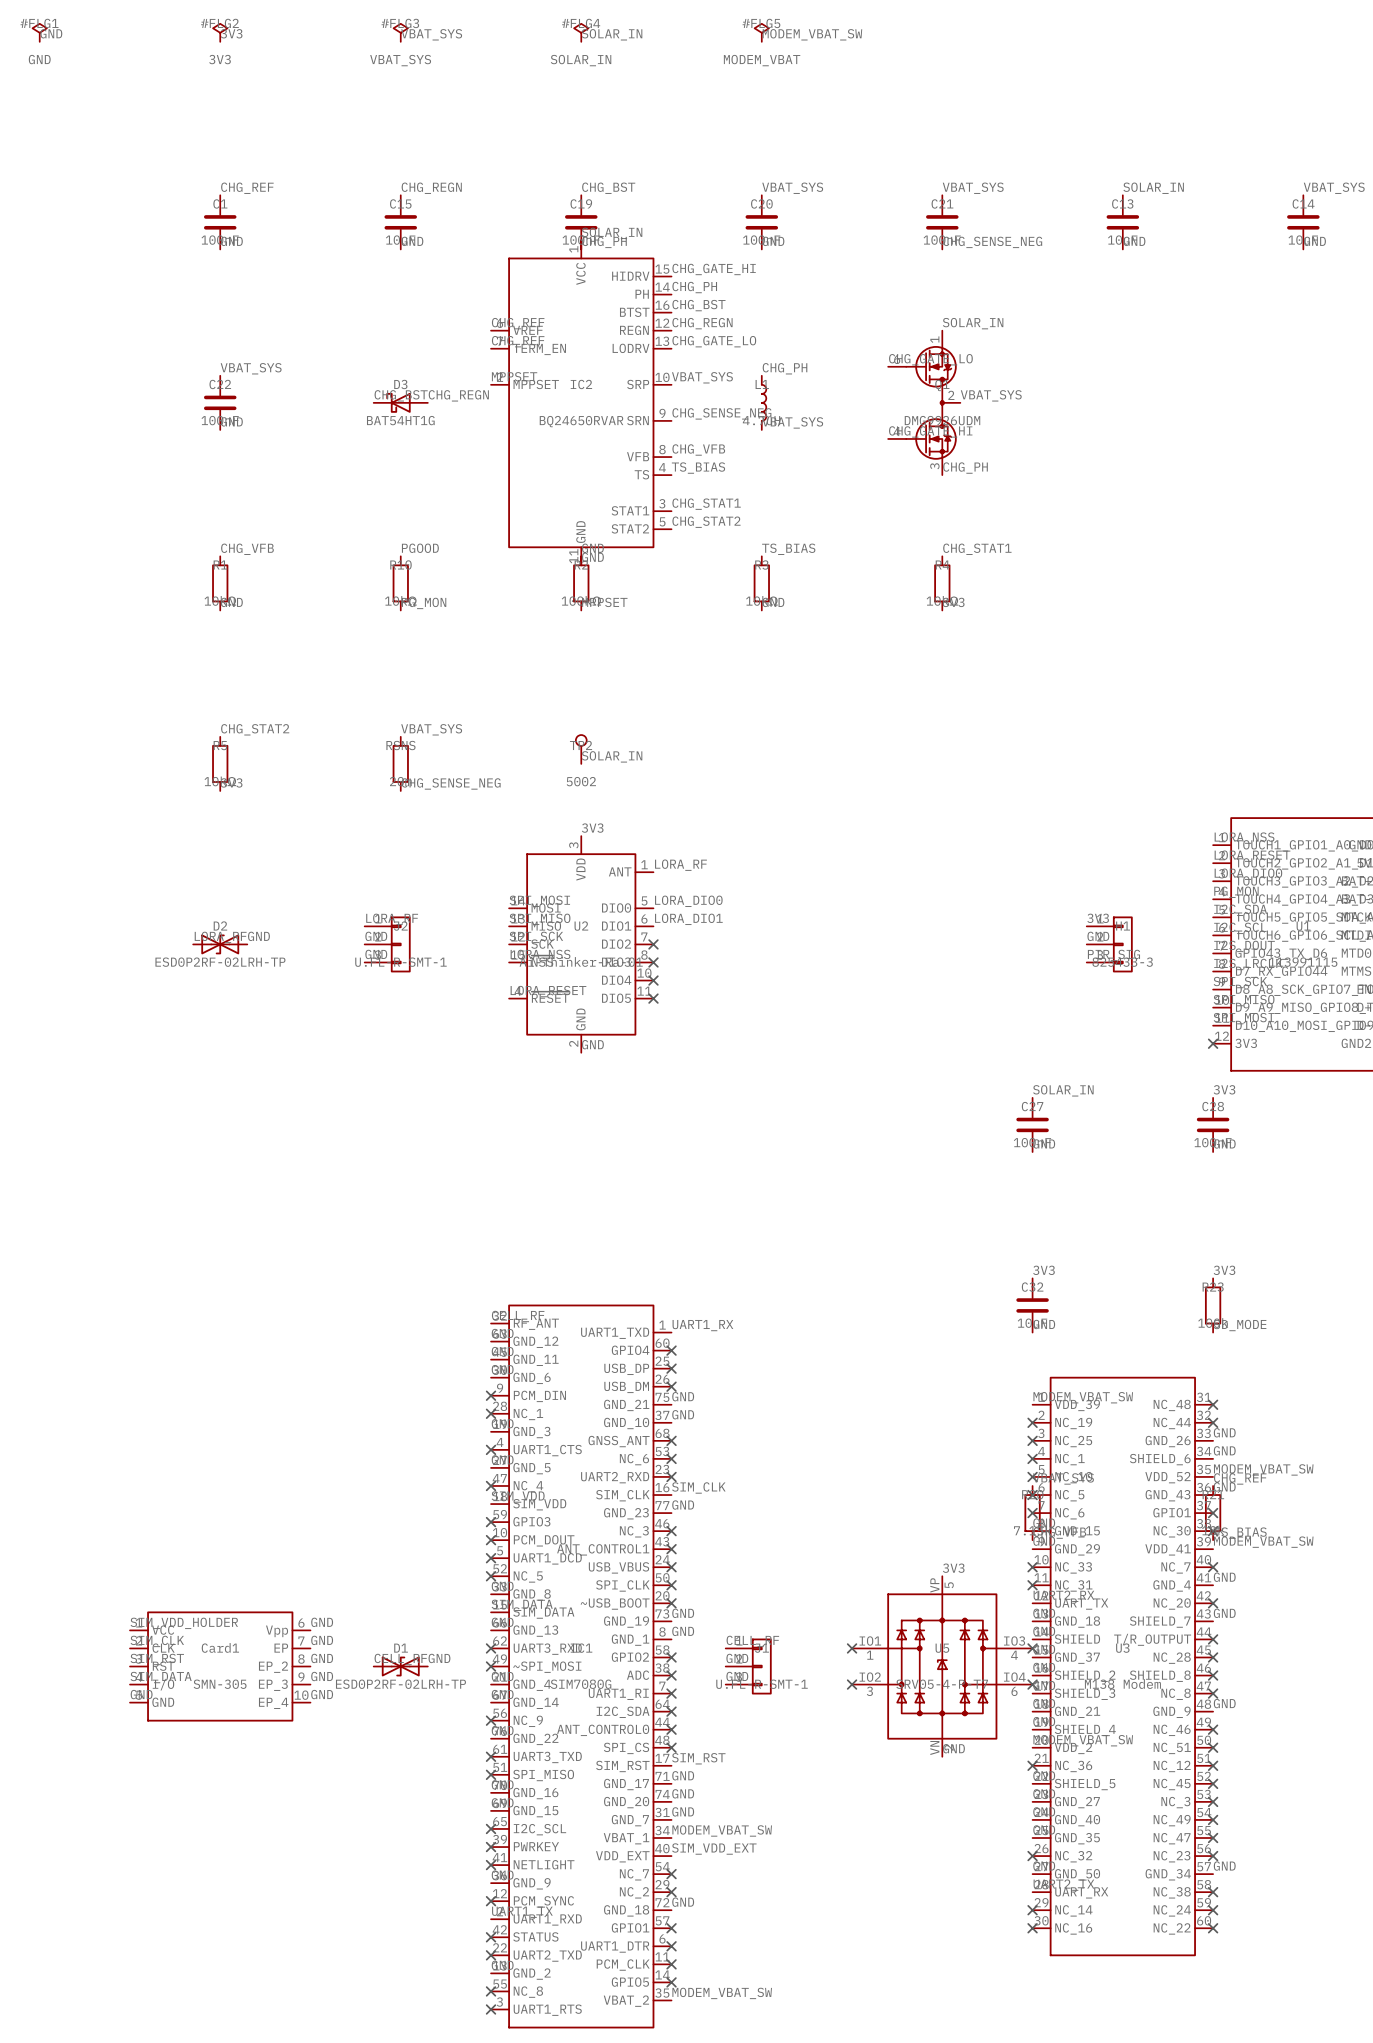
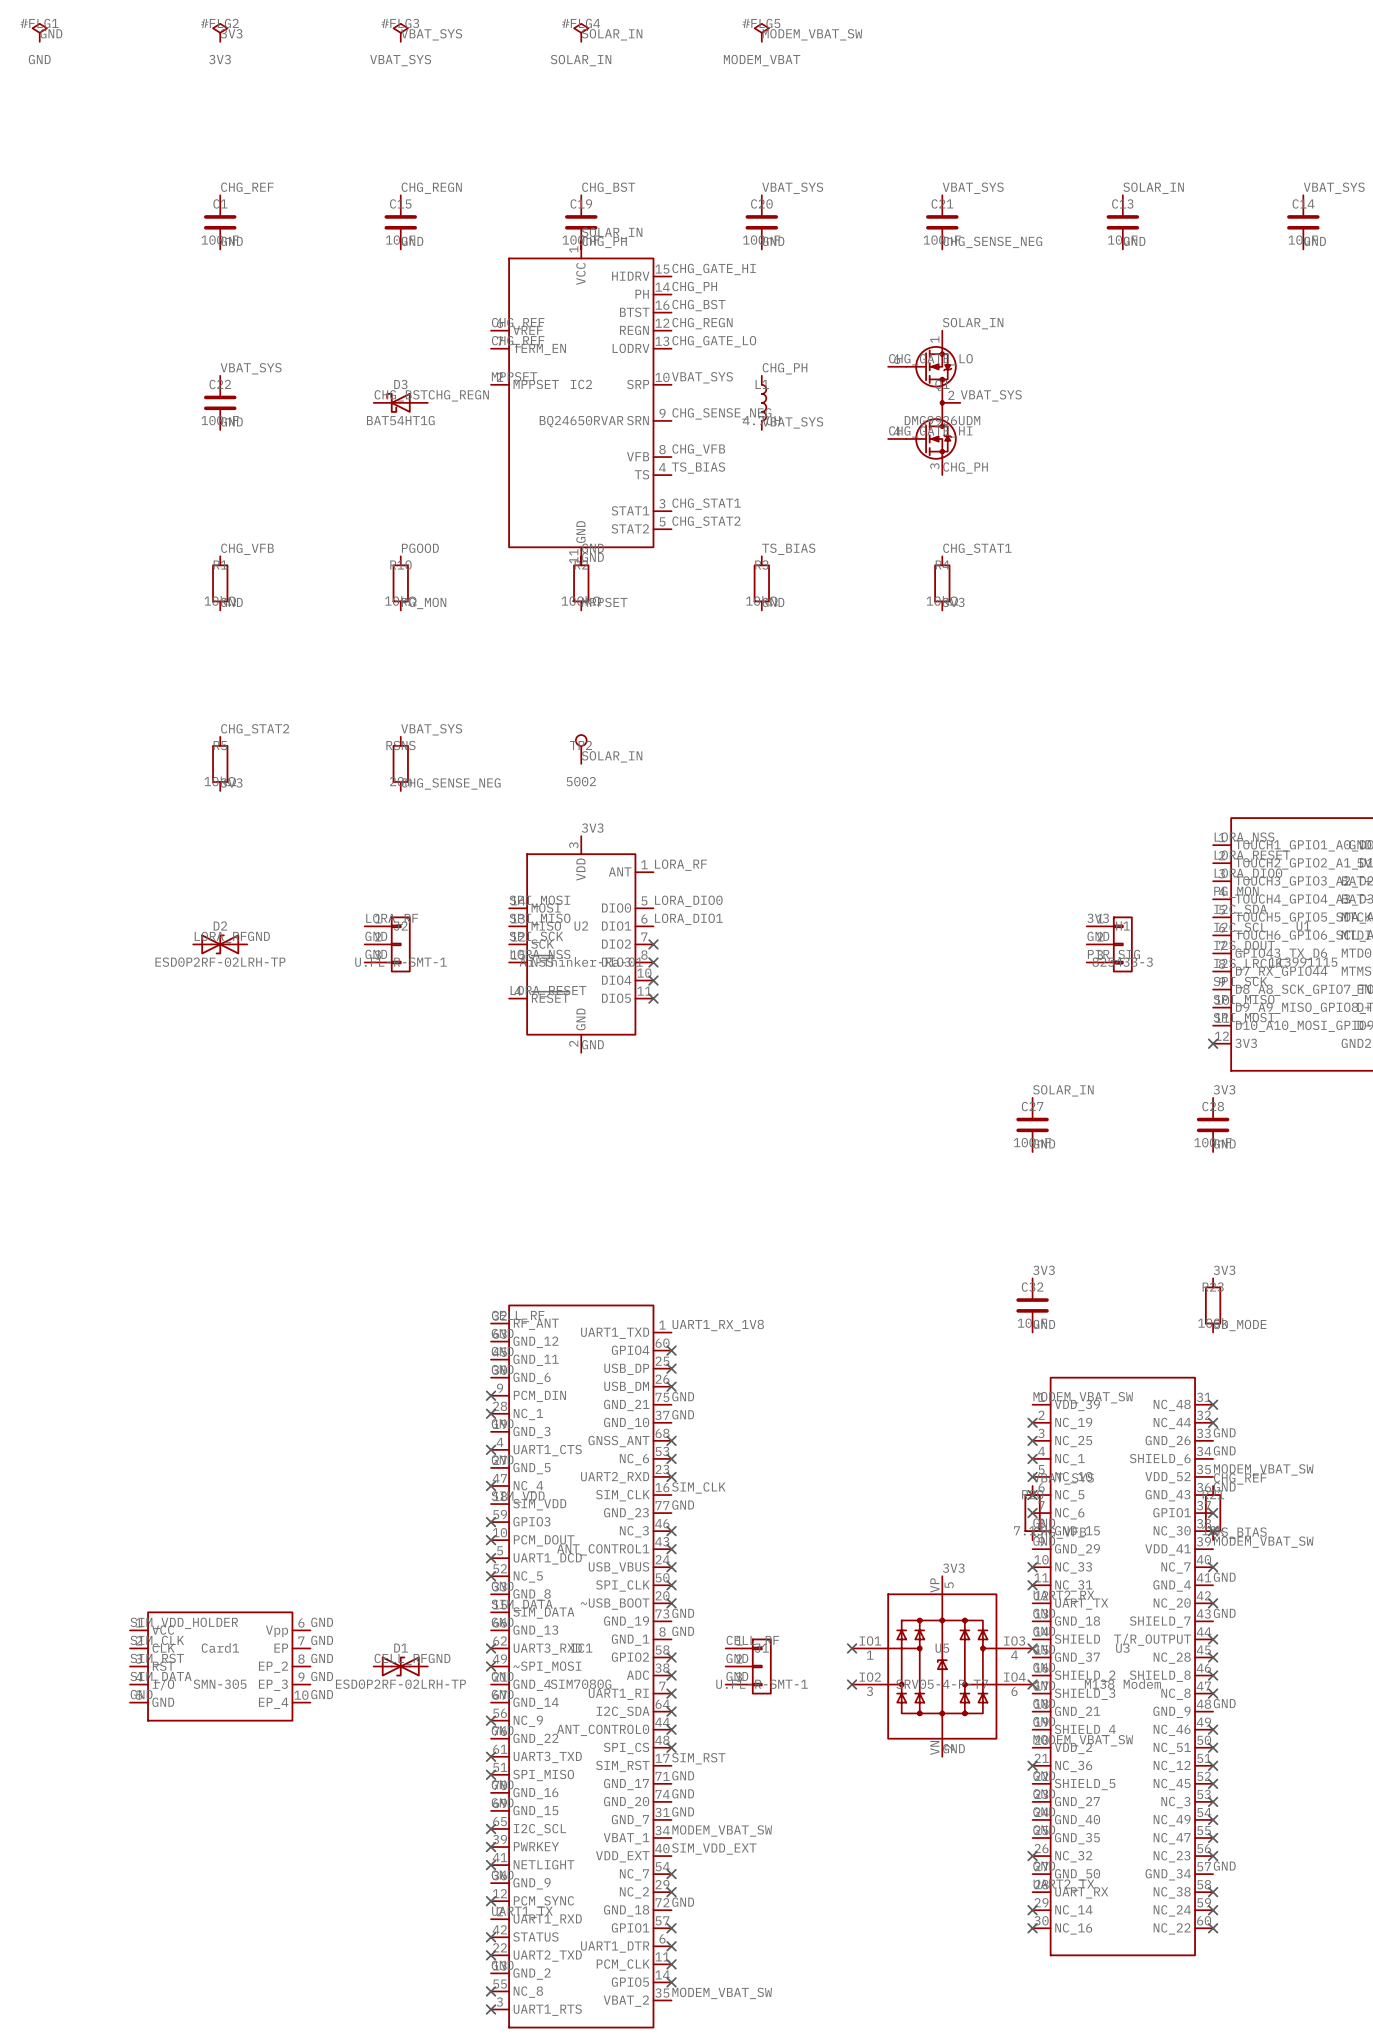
label: UART1_RX (702, 1325) -> UART1_RX_1V8 (718, 1325)

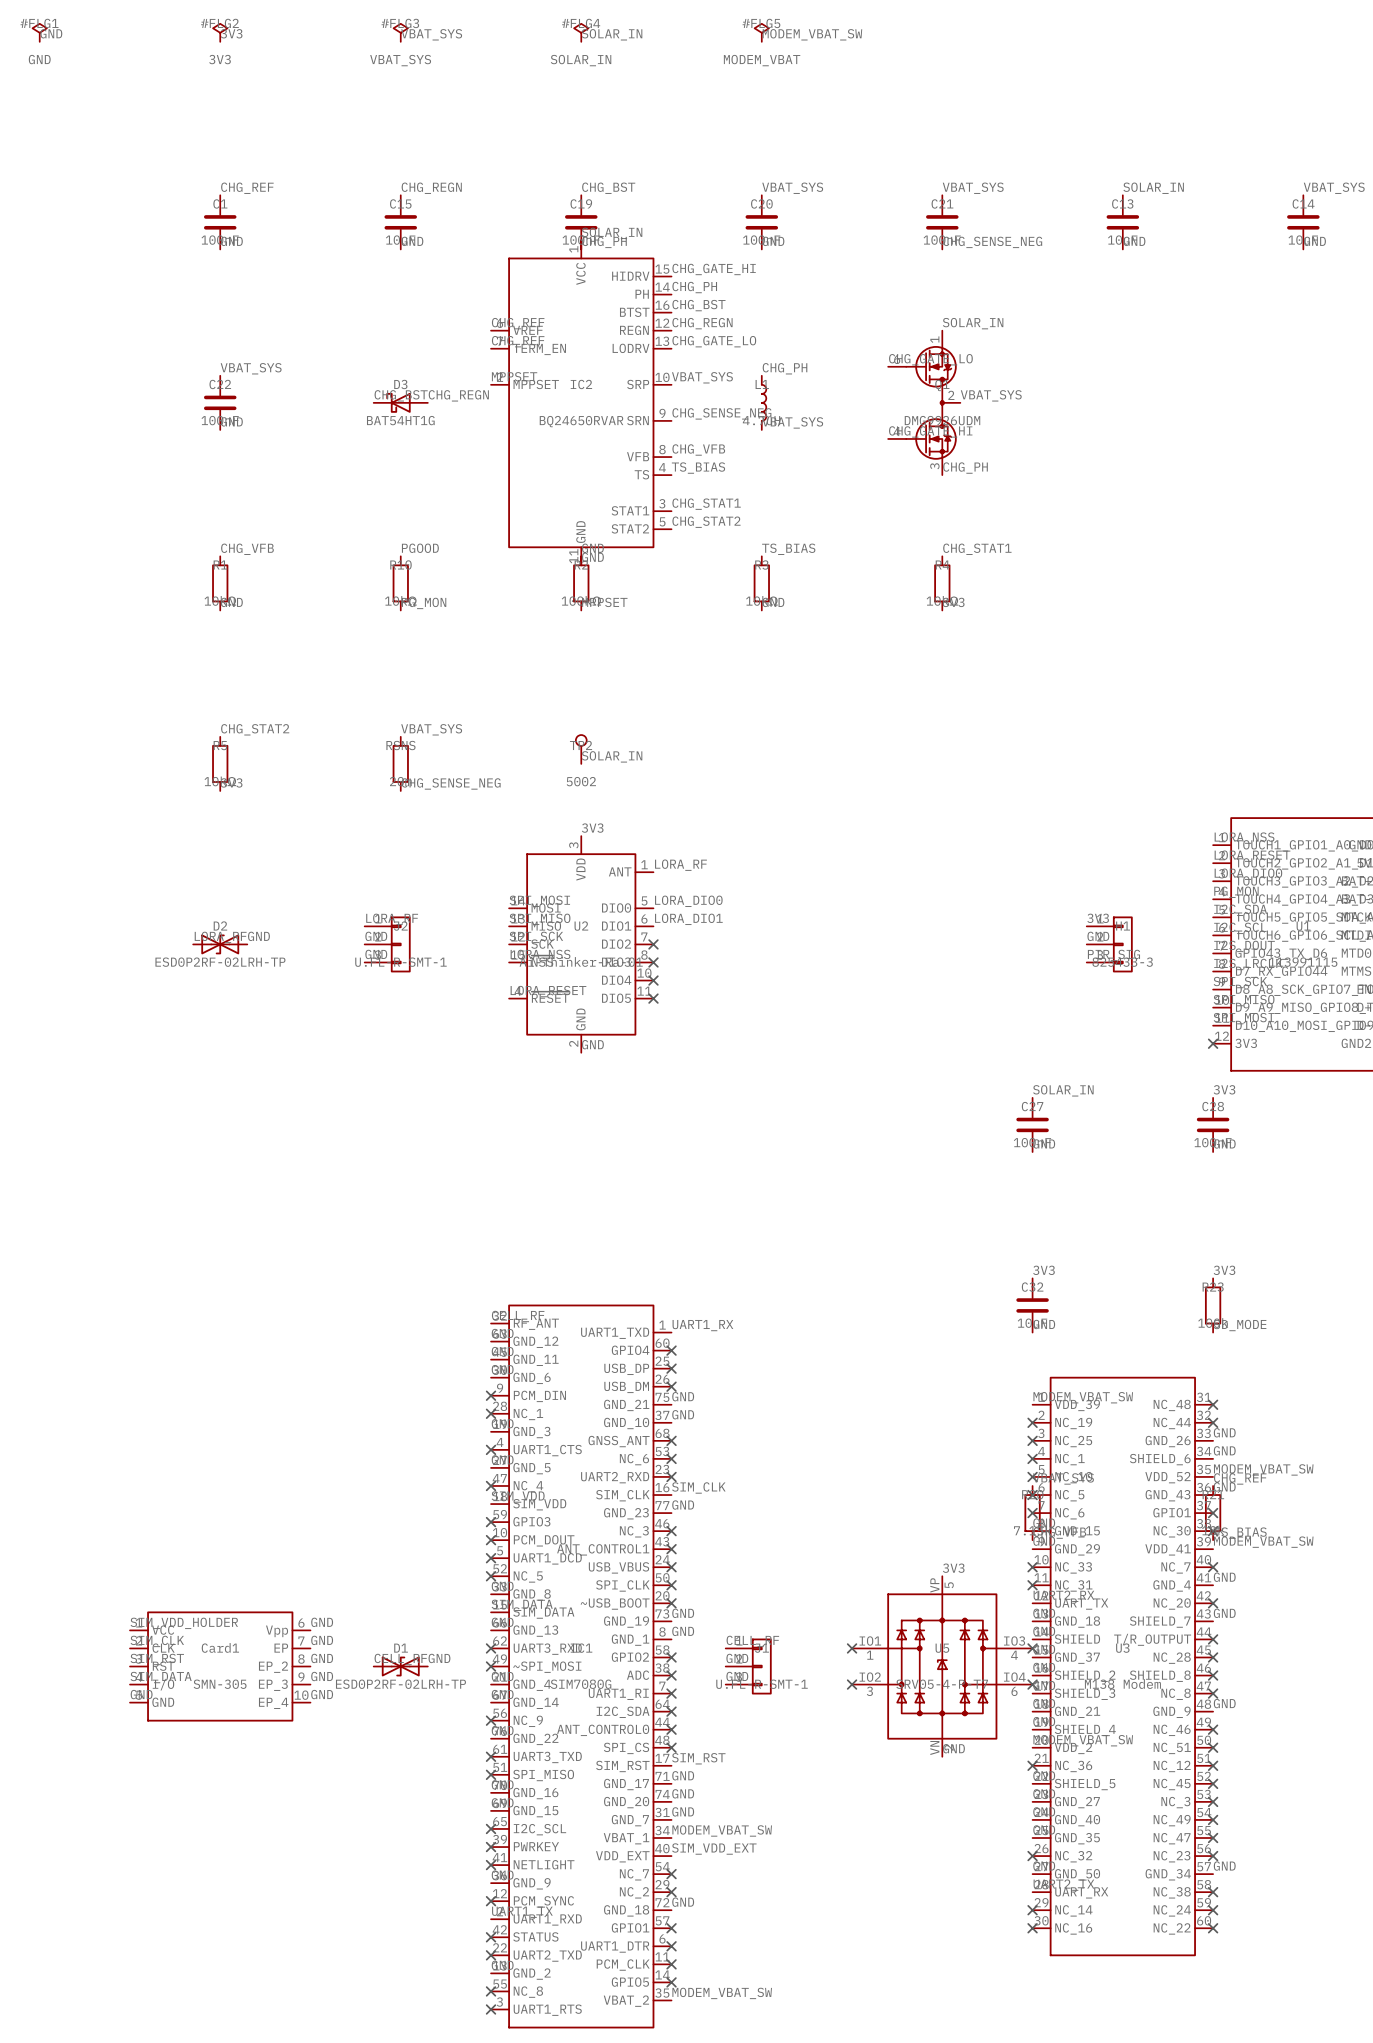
label: UART1_RX_1V8 (718, 1325) -> UART1_RX (702, 1325)

